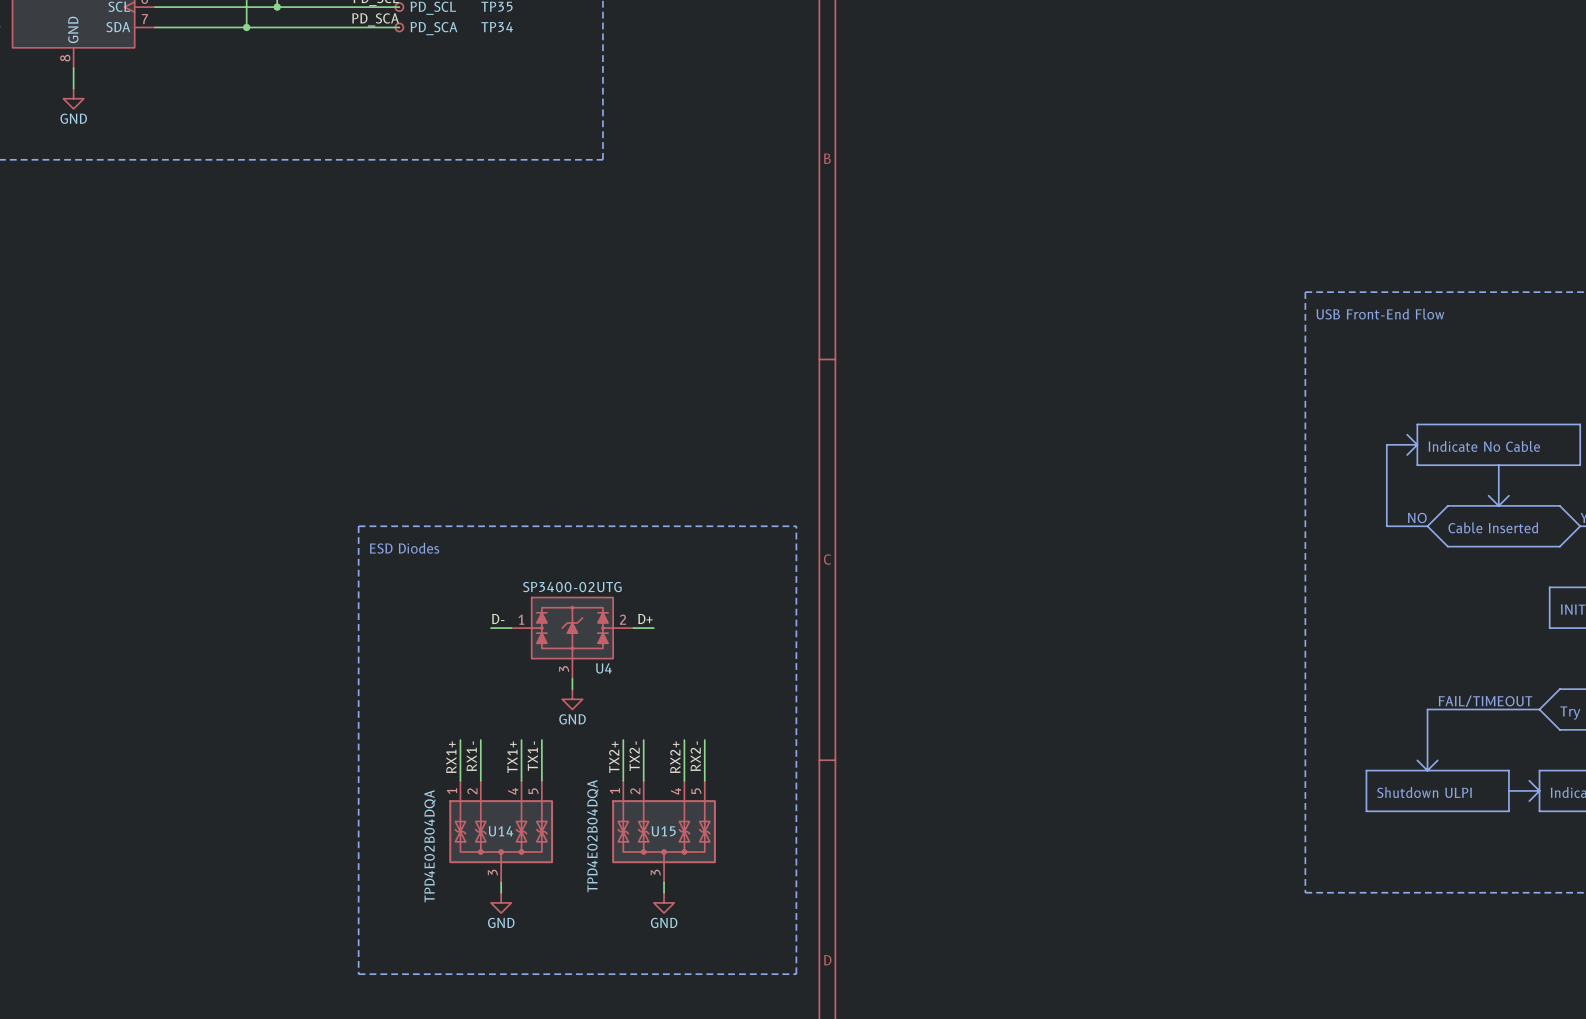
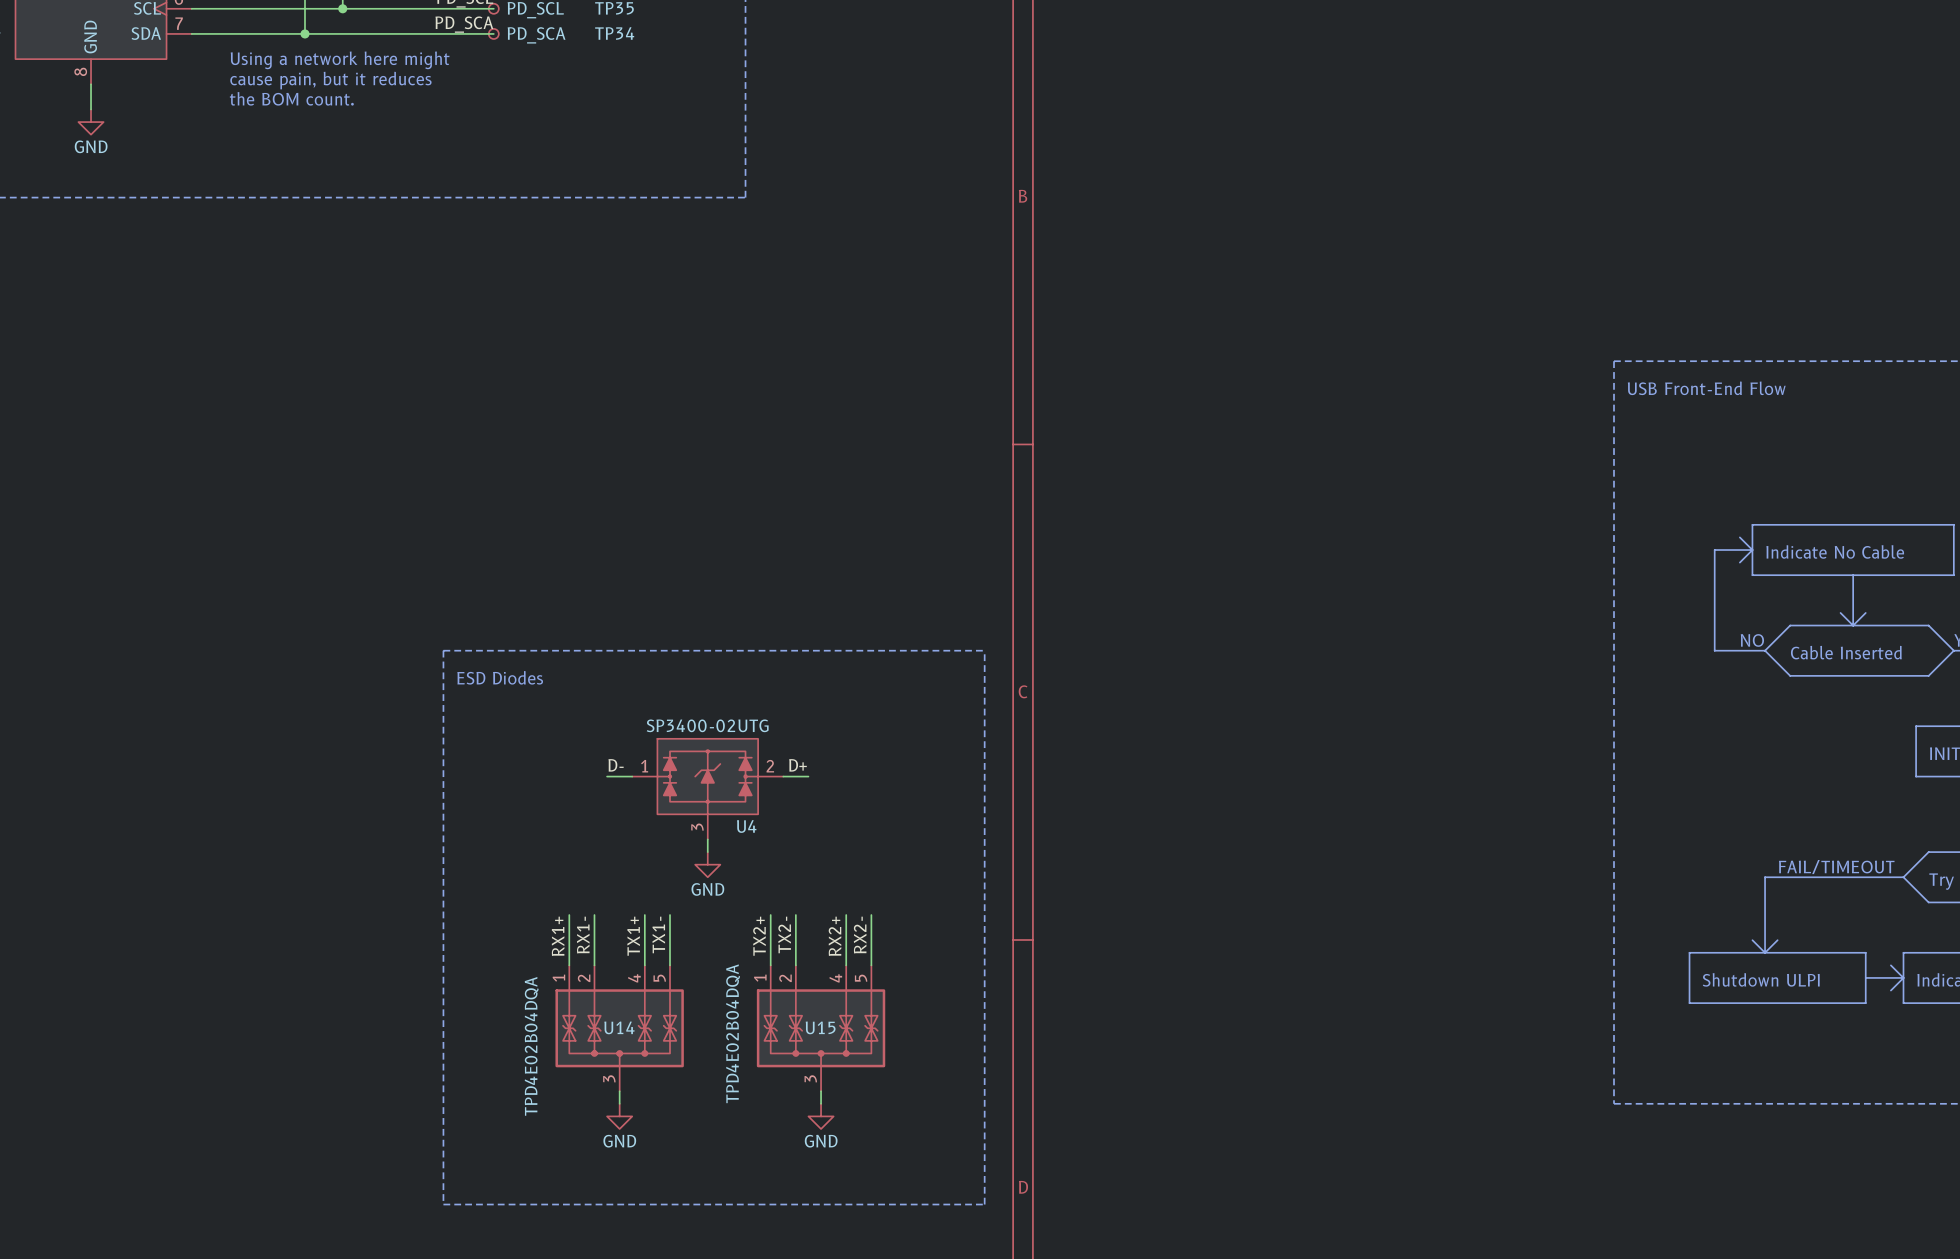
text: none -> Using a network here might (340, 60)
text: none -> cause pain, but it reduces (330, 80)
text: none -> the BOM count. (291, 98)

